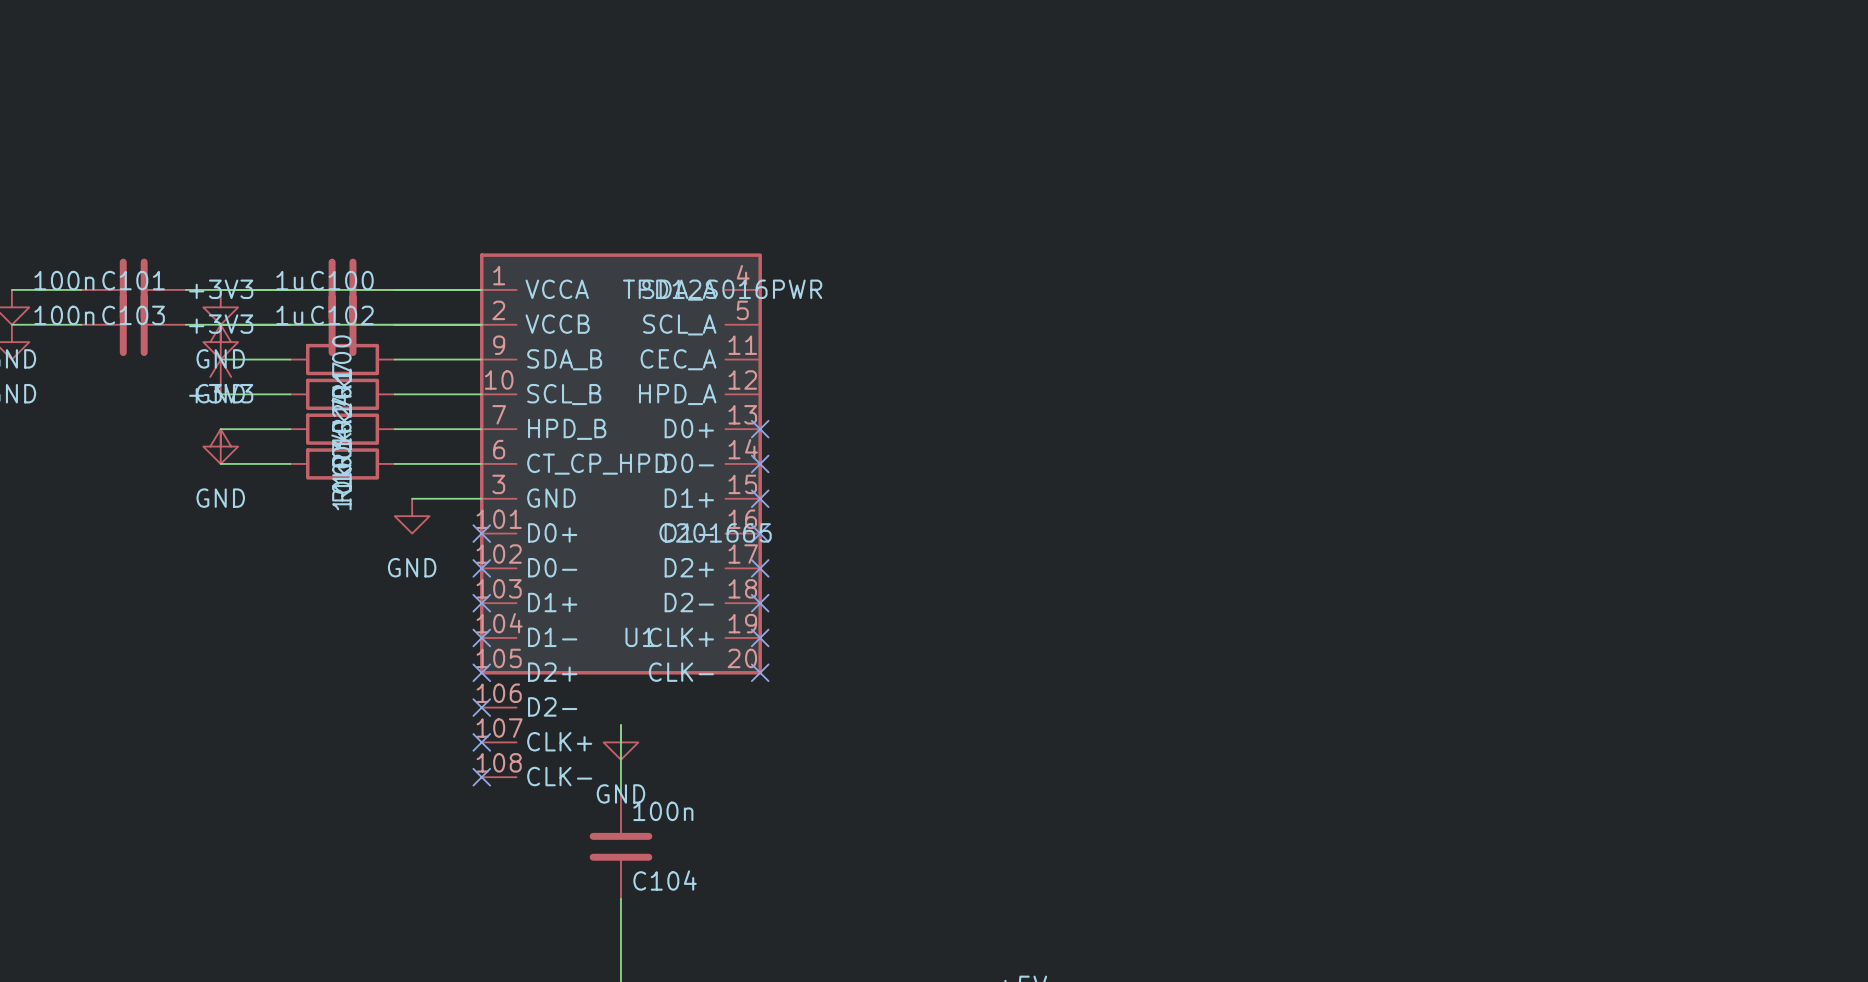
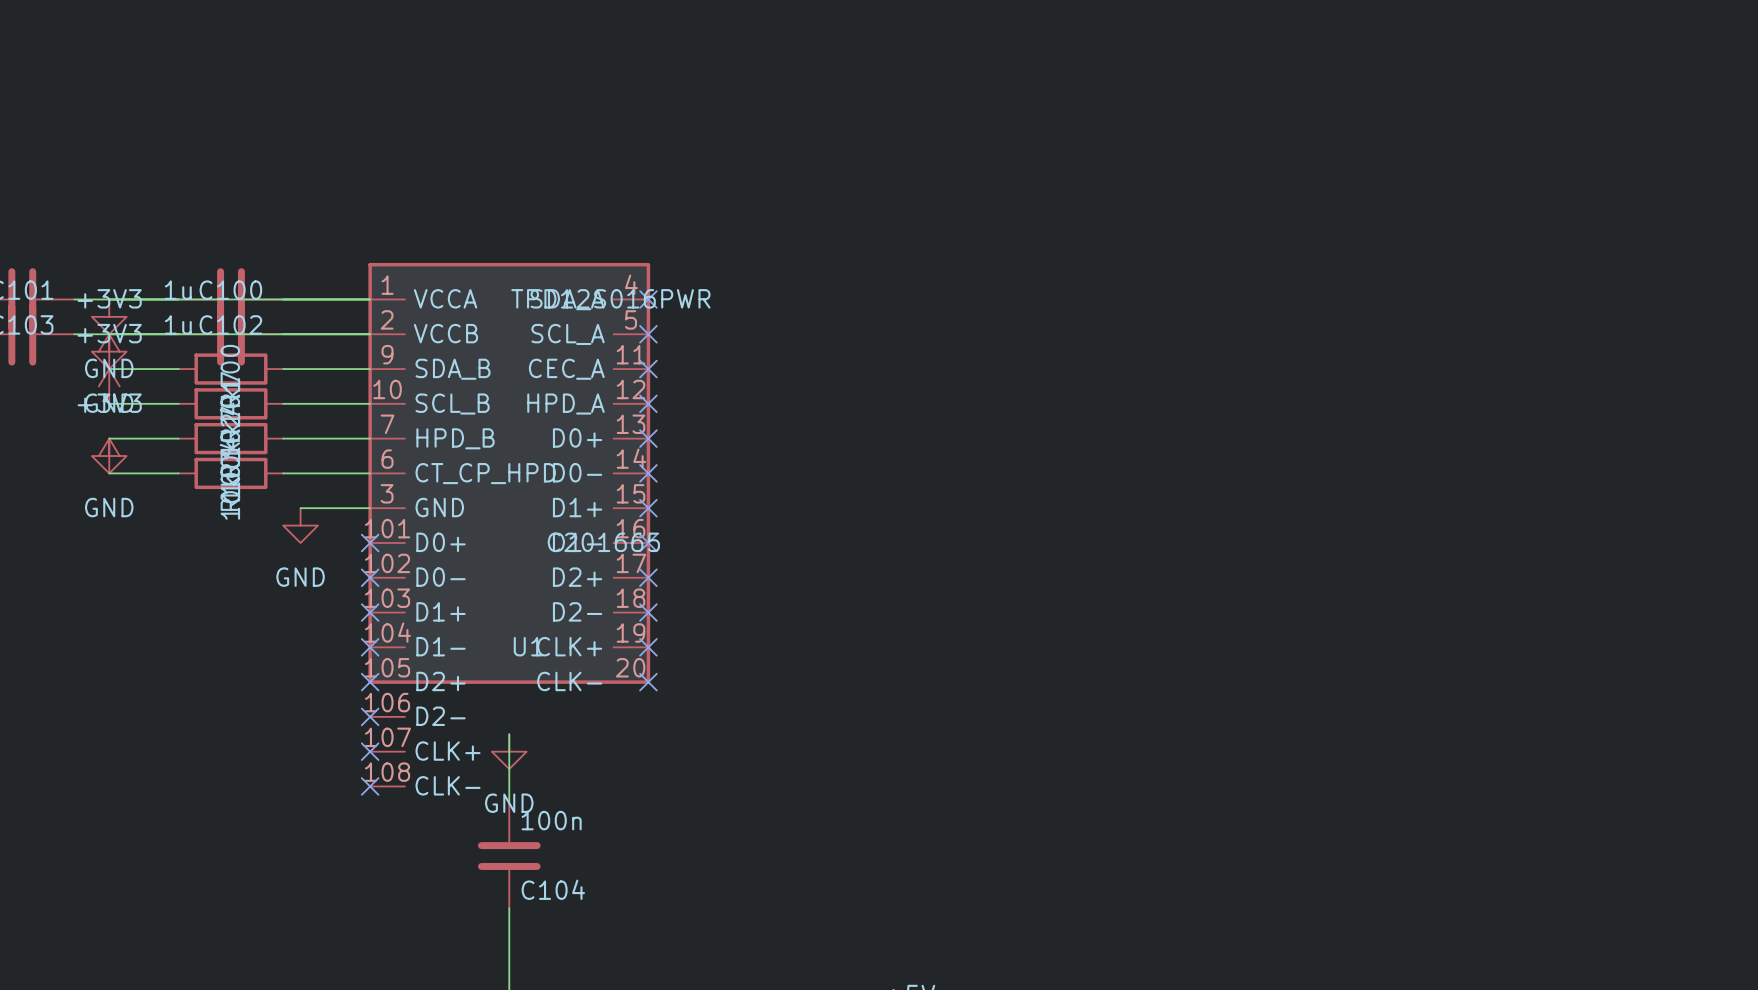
no-connect mark: none -> (648, 299)
no-connect mark: none -> (648, 334)
no-connect mark: none -> (648, 369)
no-connect mark: none -> (648, 403)

